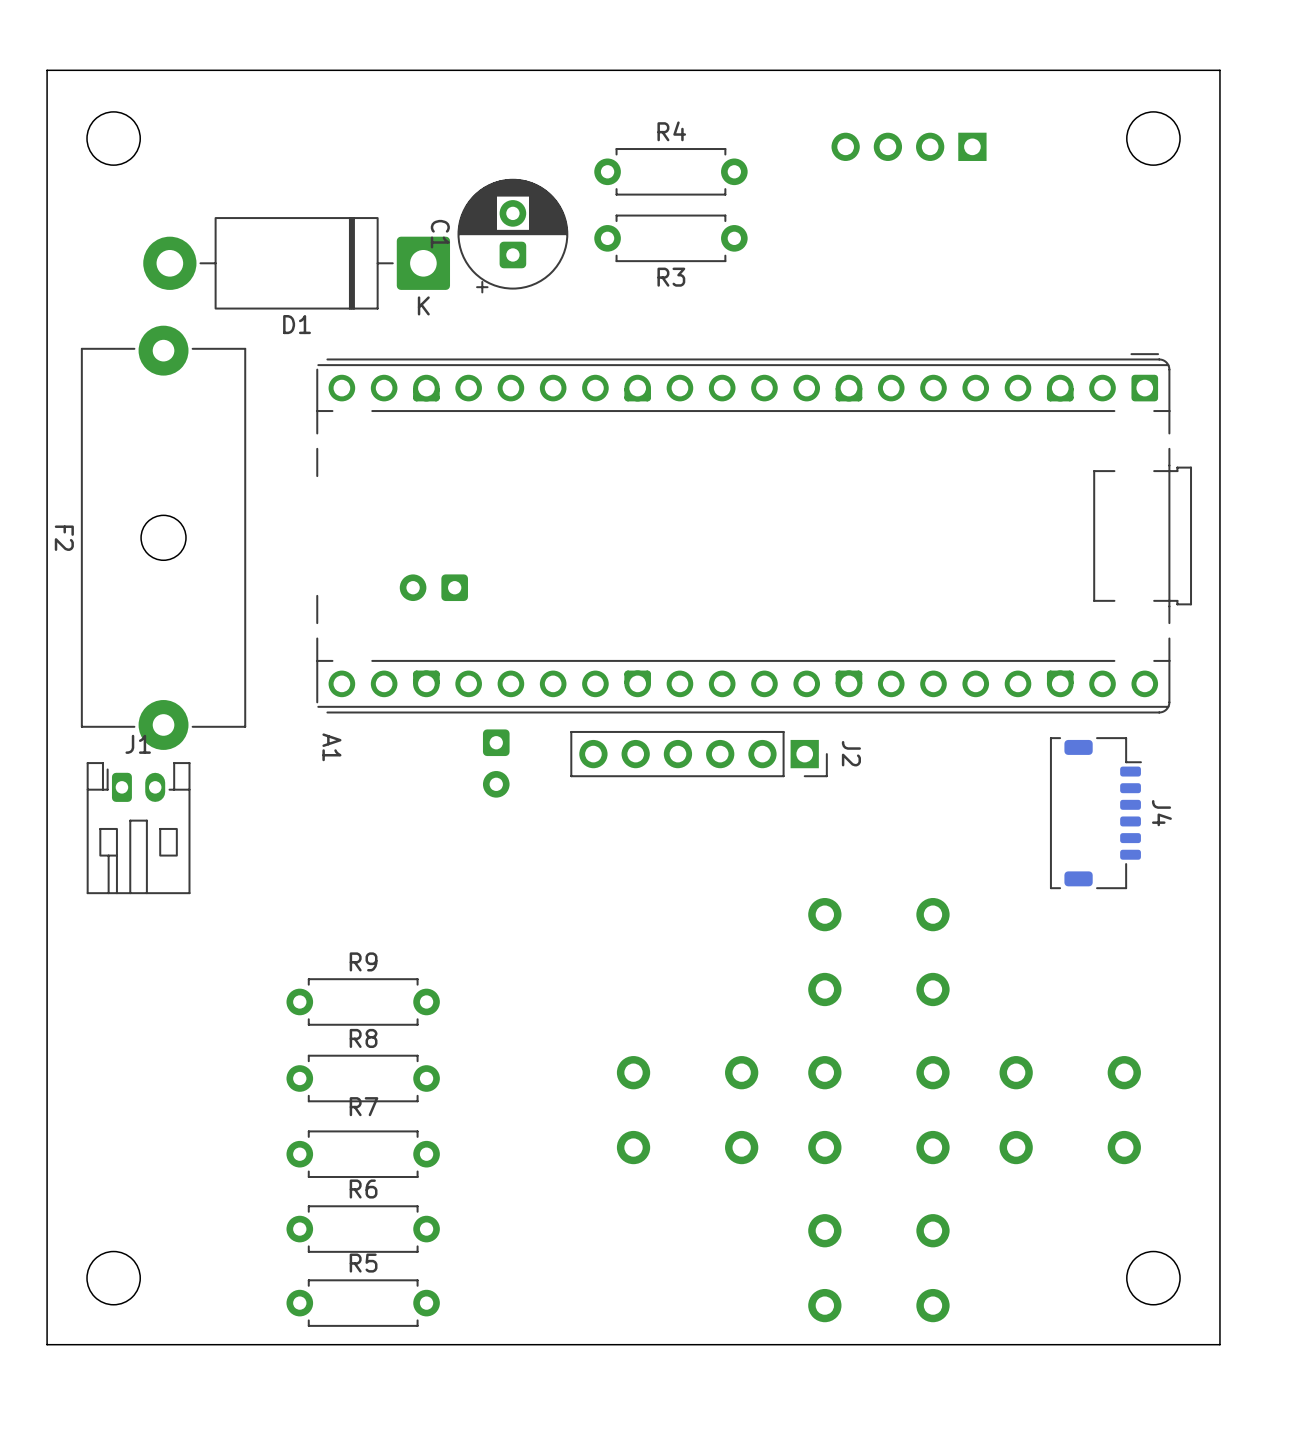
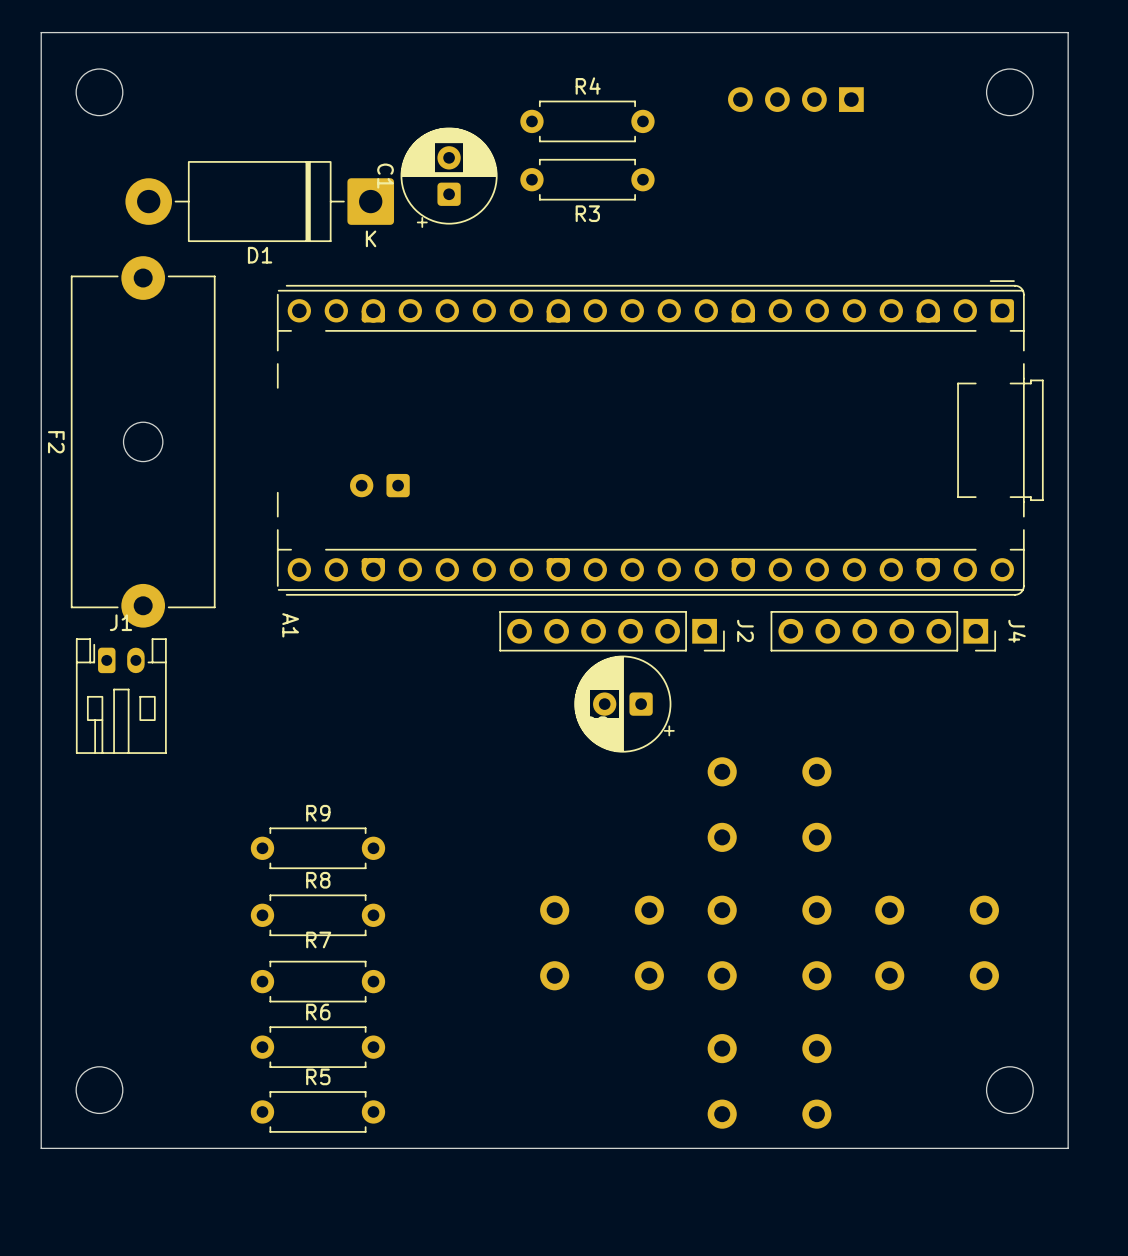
J4 footprint: [1049, 737, 1142, 890] -> [770, 611, 997, 652]
part side: top (496, 763) -> bottom (624, 704)
J4 name position: J4 (1161, 813) -> J4 (1017, 631)

